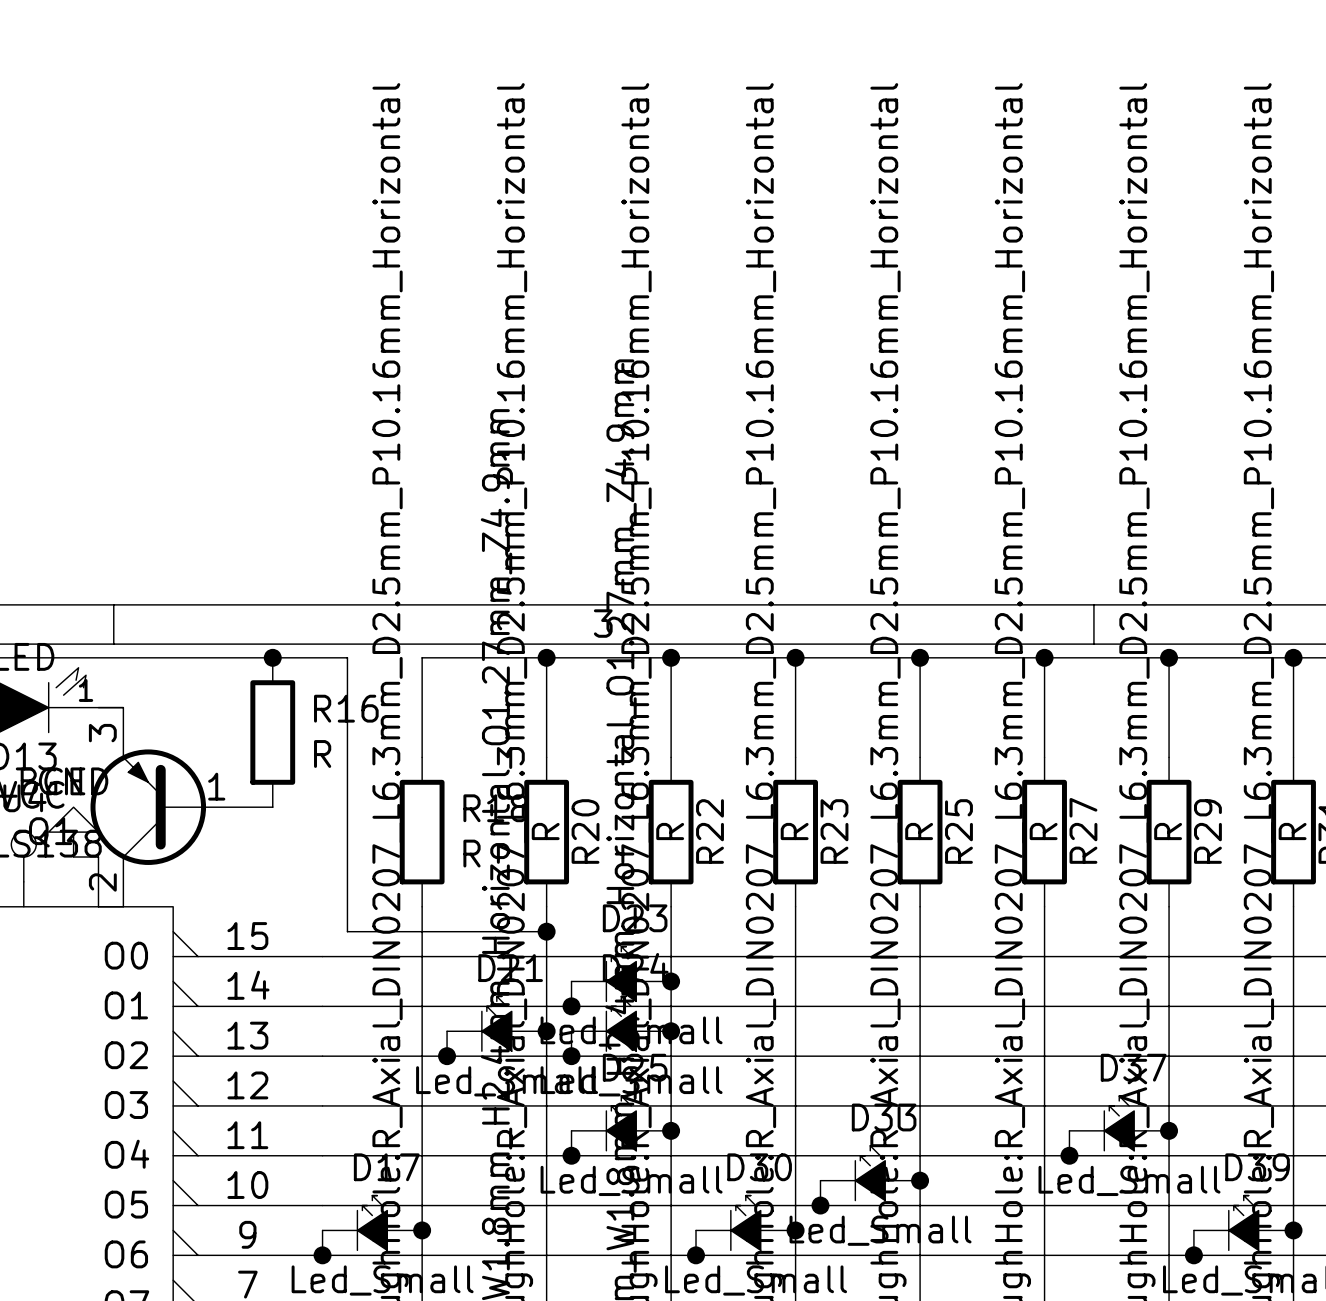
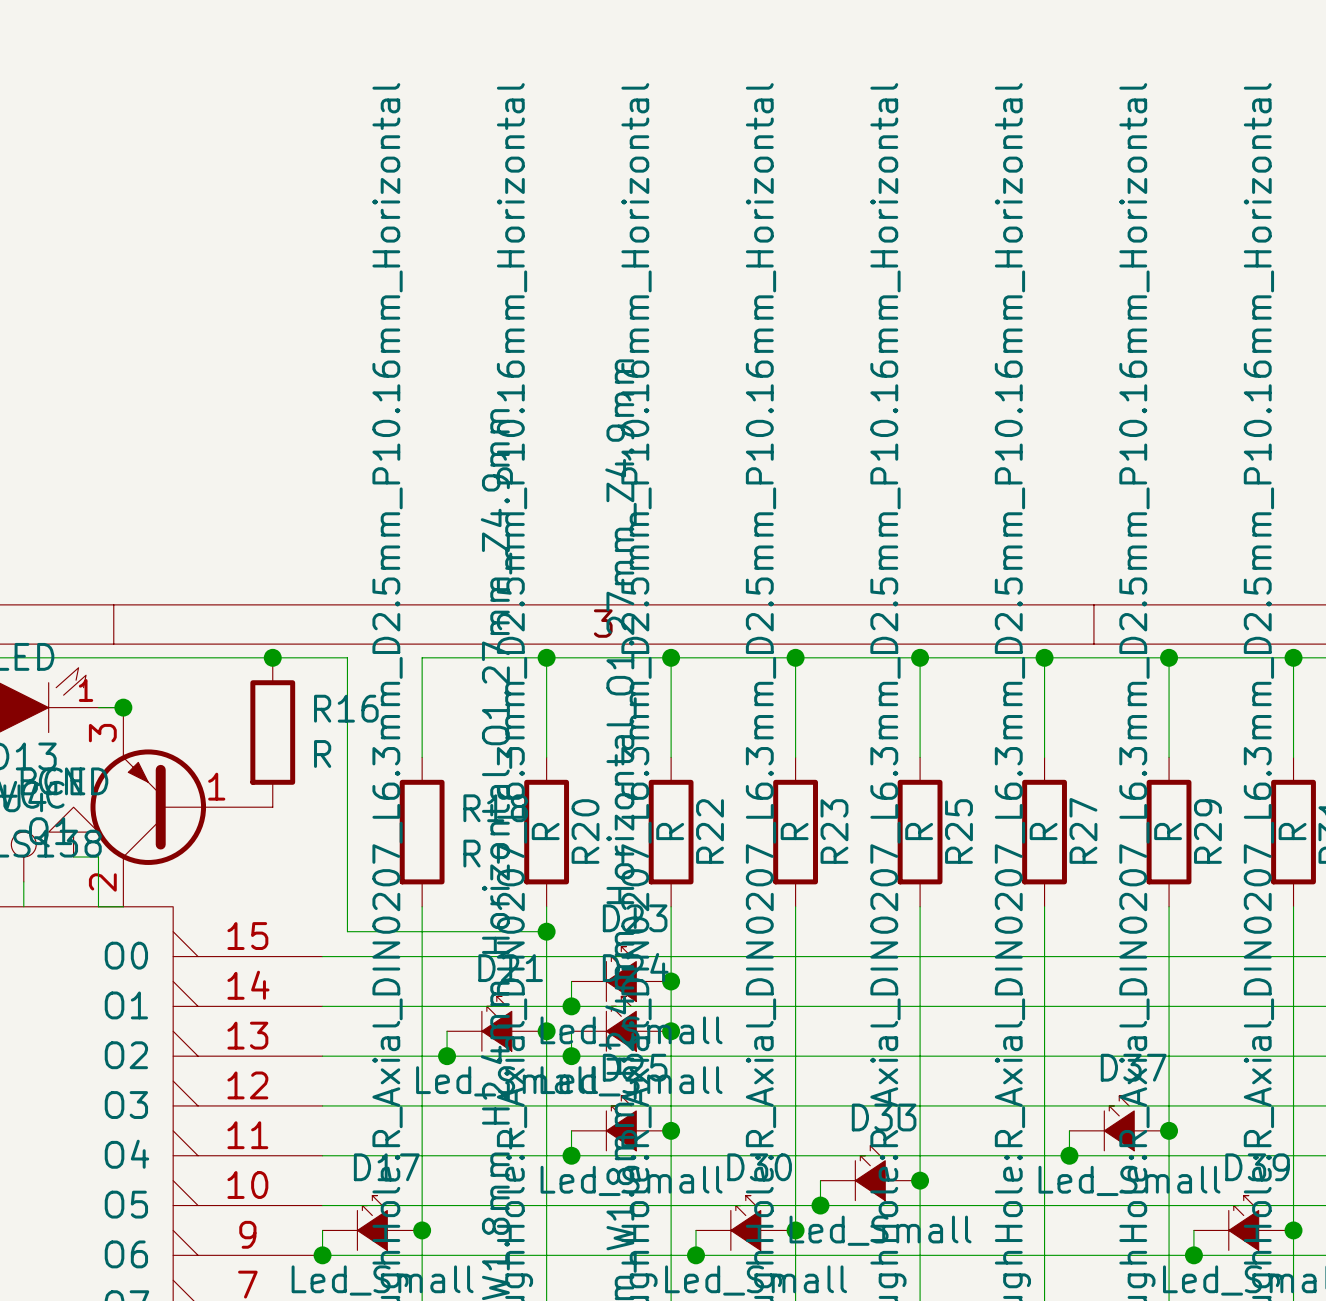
junction: none -> (123, 707)

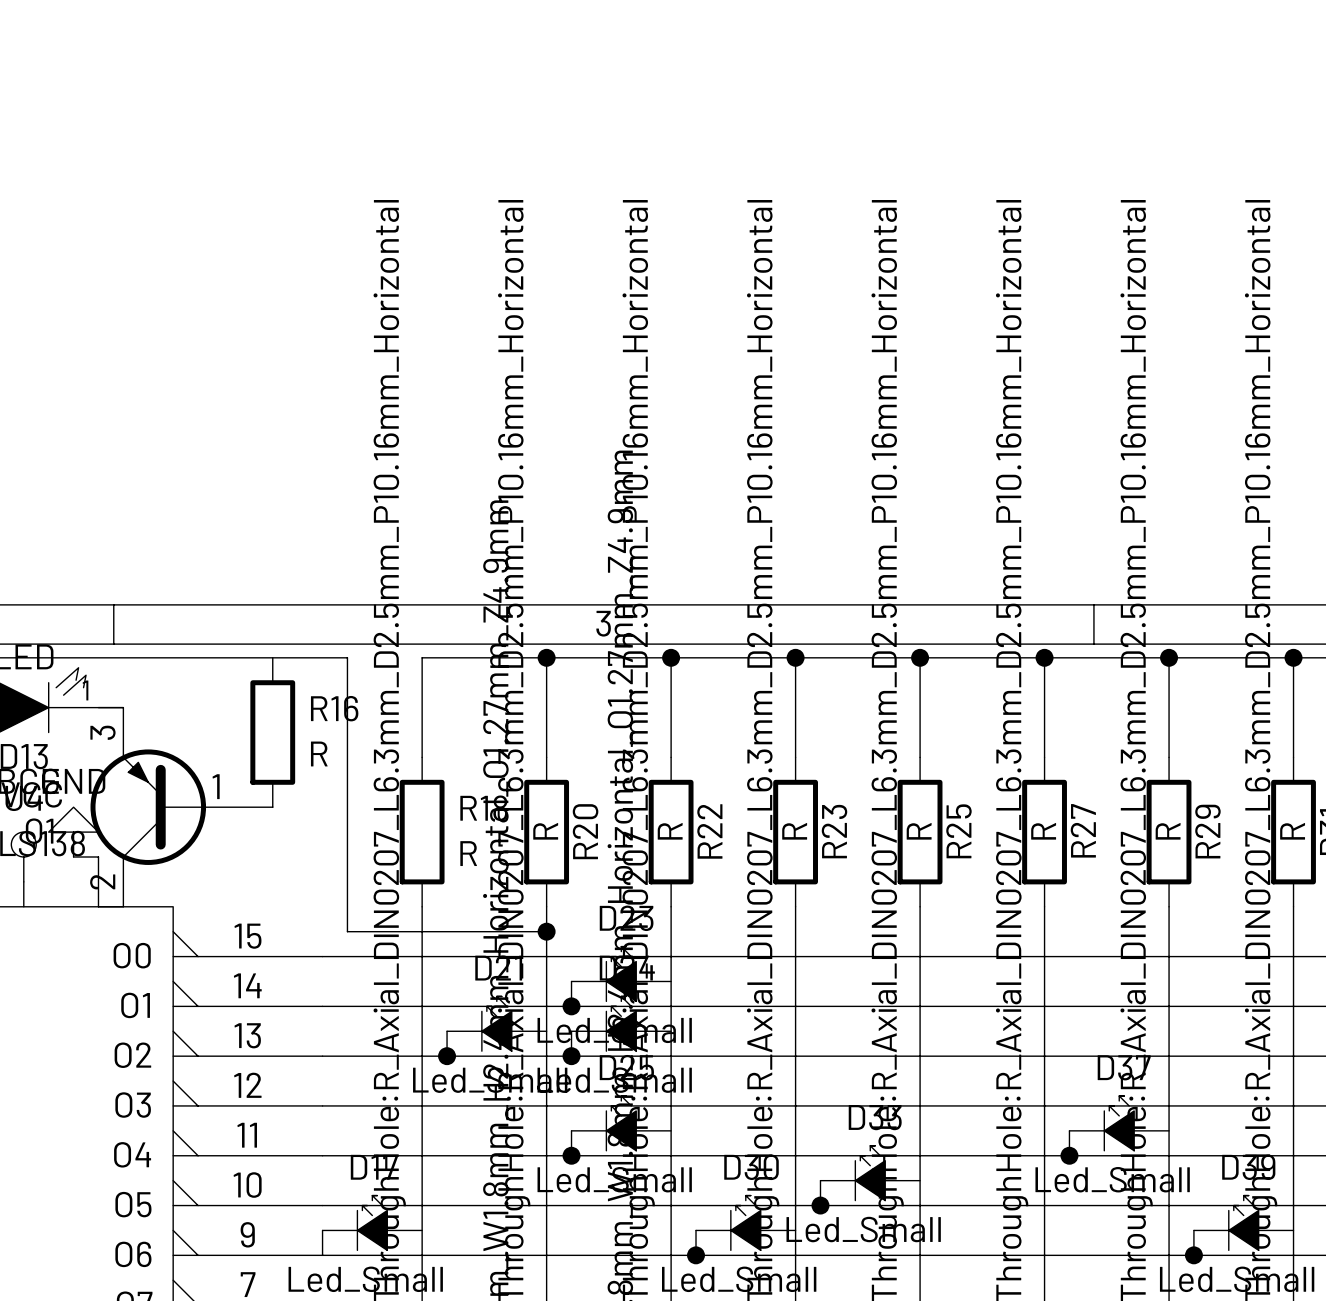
junction: (272, 657) -> none
junction: (123, 707) -> none
junction: (671, 981) -> none
junction: (546, 1031) -> none
junction: (671, 1031) -> none
junction: (671, 1130) -> none
junction: (1169, 1130) -> none
junction: (920, 1180) -> none
junction: (422, 1230) -> none
junction: (795, 1230) -> none
junction: (1293, 1230) -> none
junction: (322, 1255) -> none

